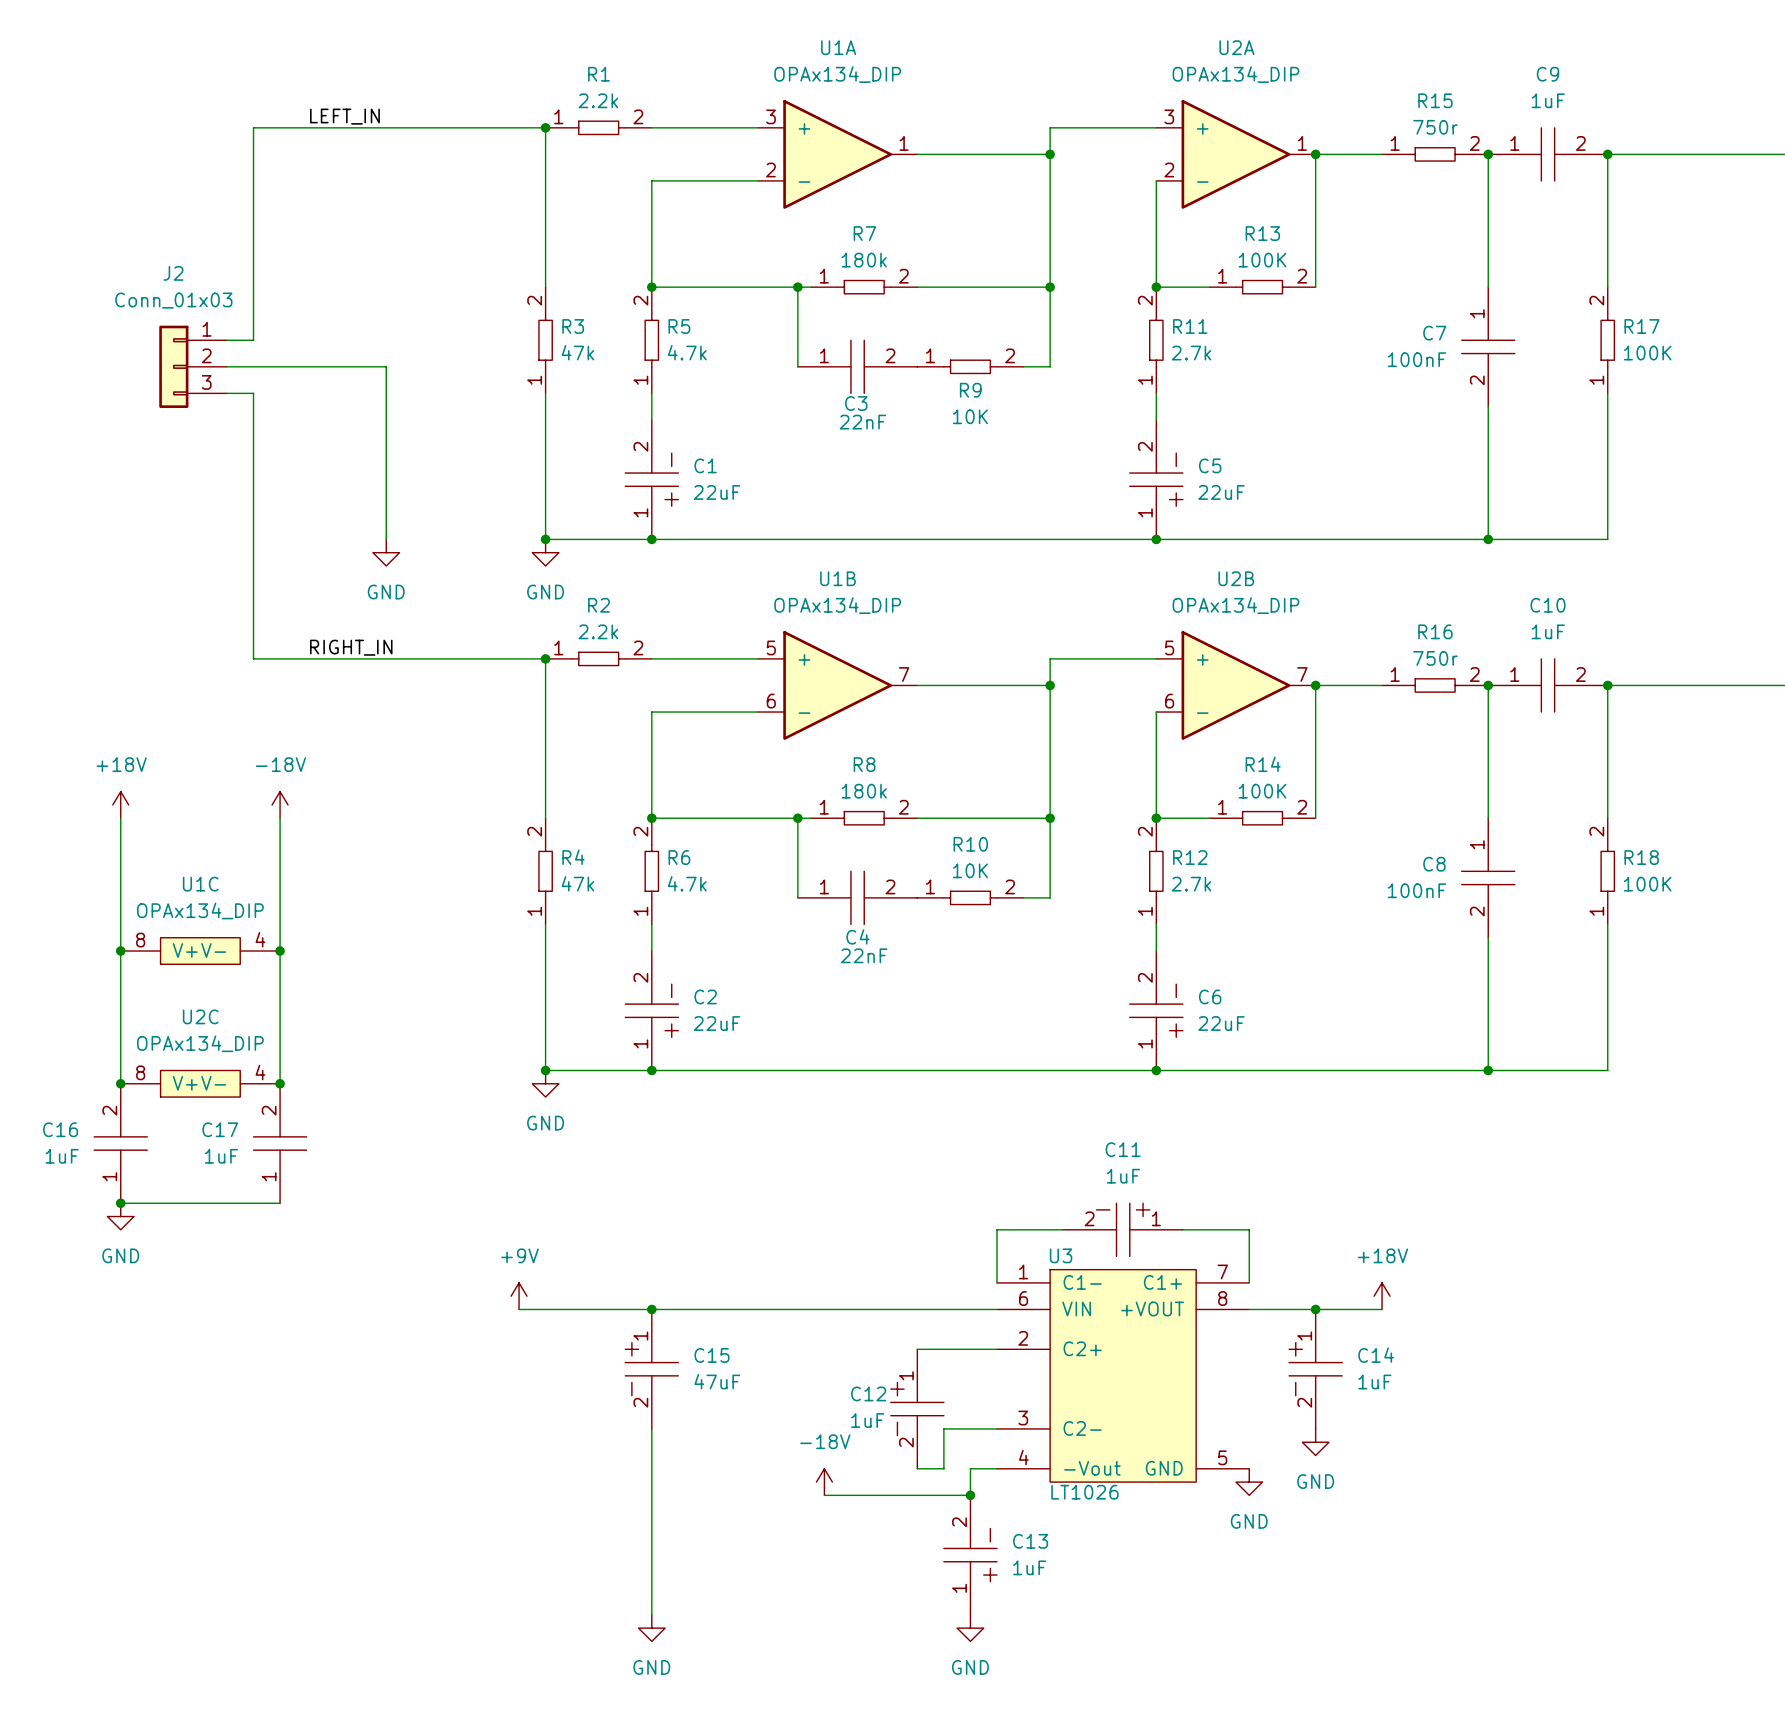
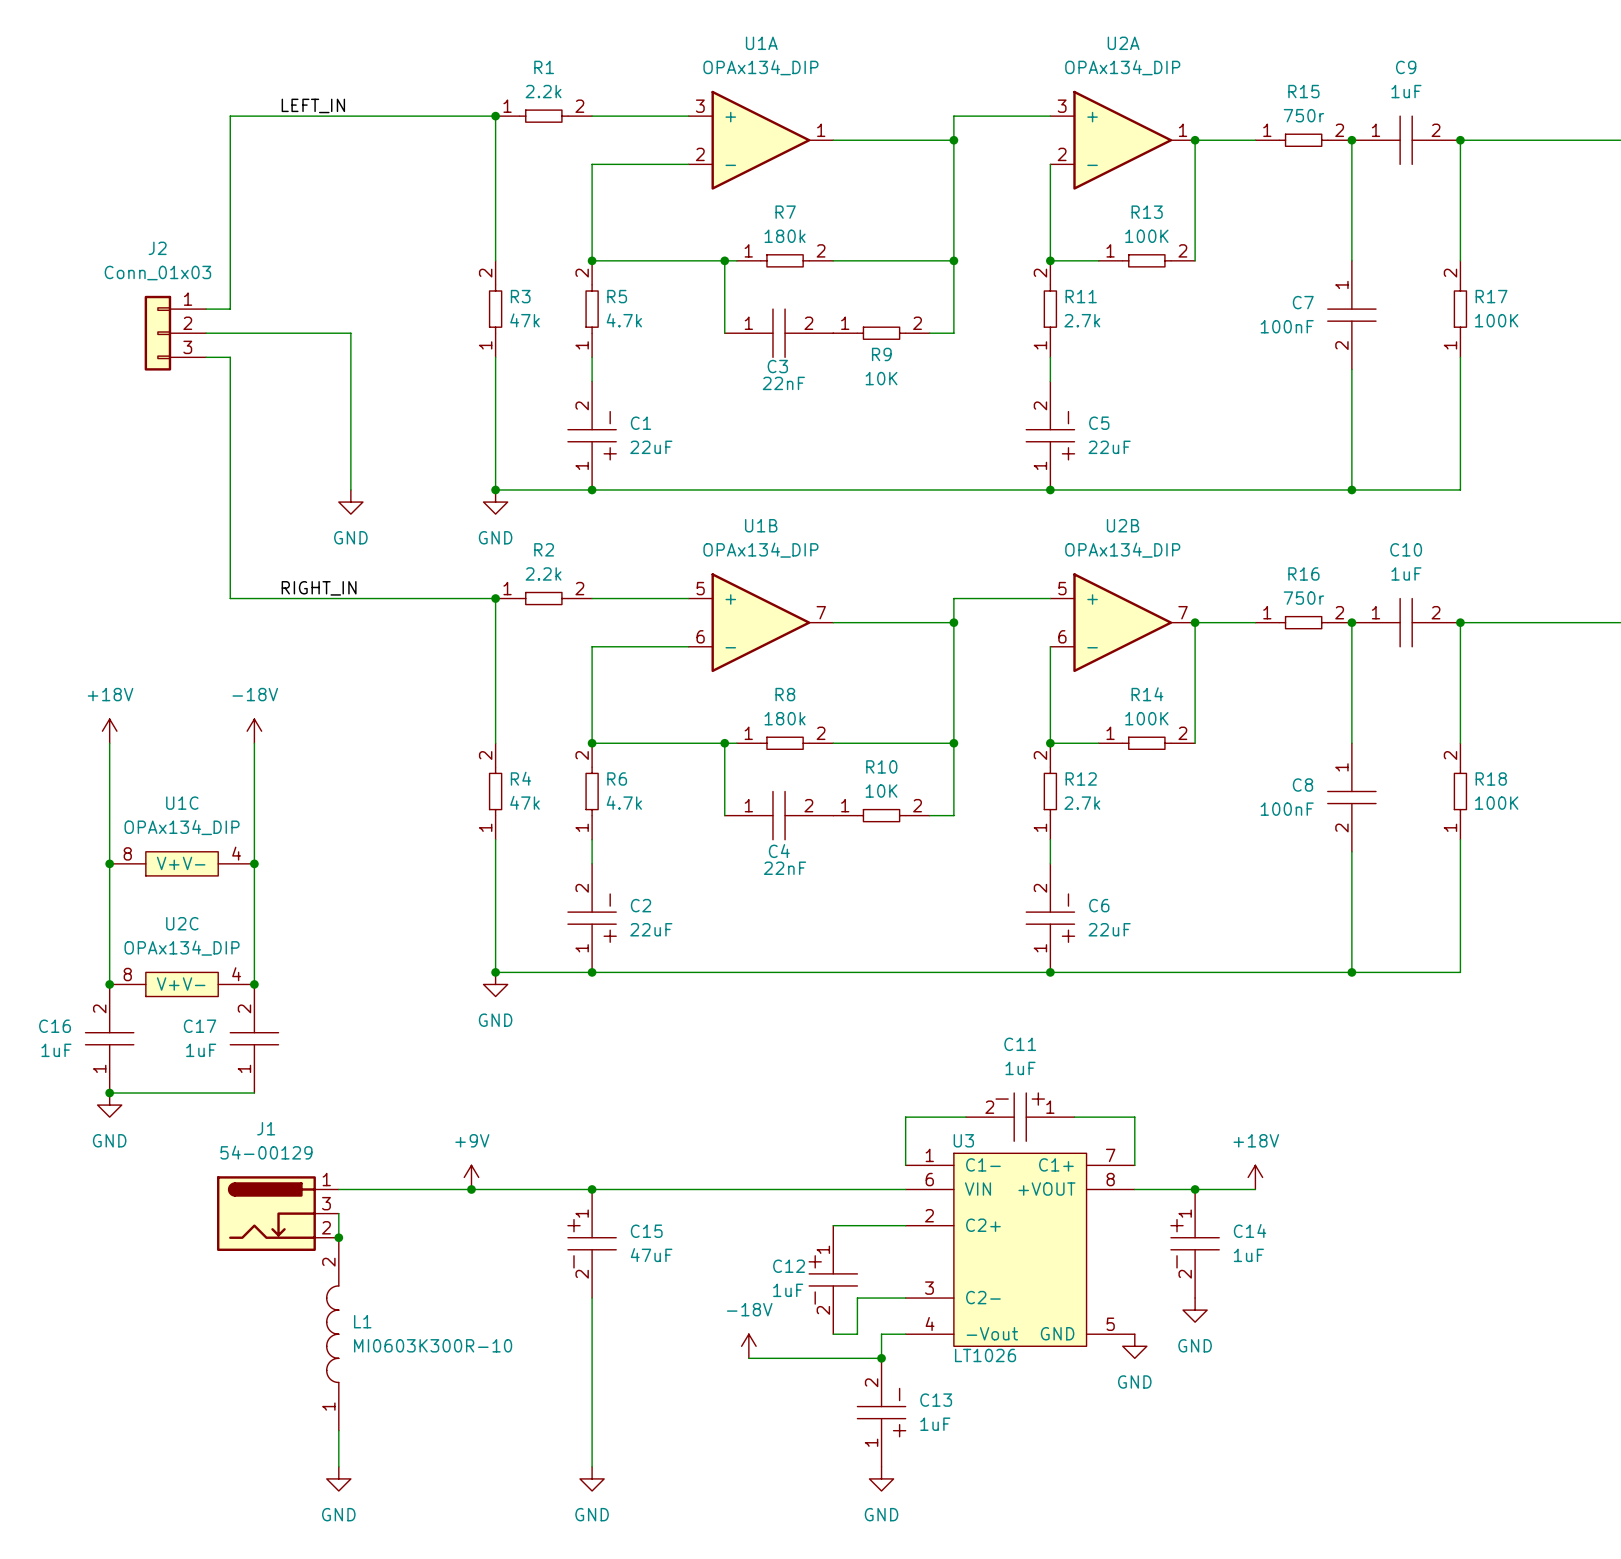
wire: none -> (338, 1189) (471, 1189)
junction: none -> (471, 1189)
J1: none -> 54-00129 (277, 1213)
wire: none -> (338, 1213) (338, 1237)
junction: none -> (338, 1237)
L1: none -> (332, 1334)
wire: none -> (338, 1430) (338, 1466)
power symbol: none -> GND (338, 1478)

